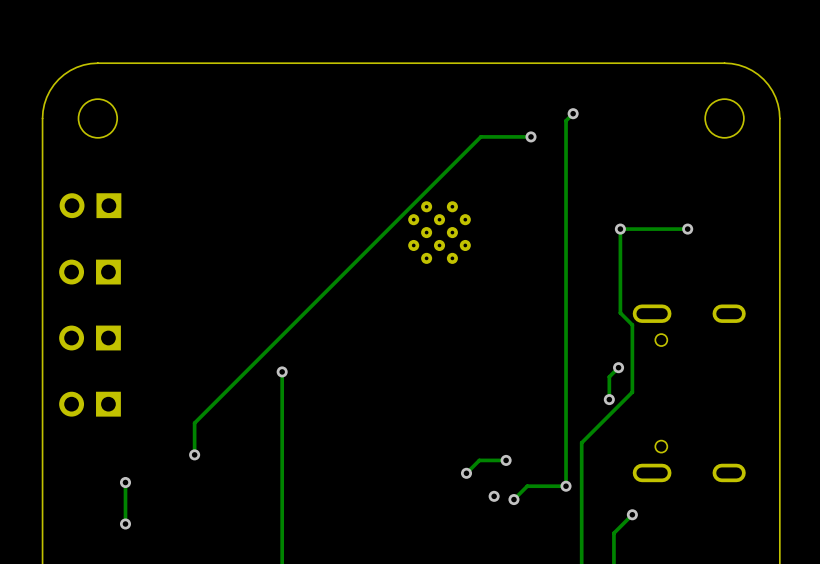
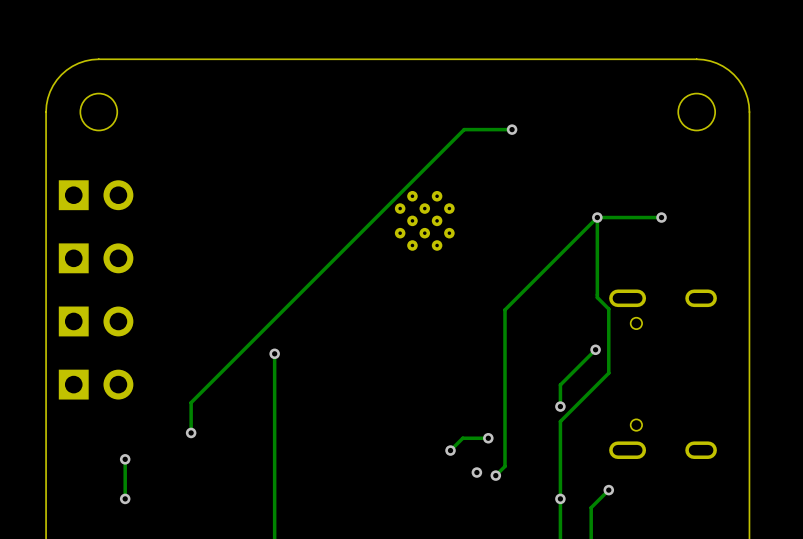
track: (573, 113) (566, 120) (566, 486) (527, 486) (523, 489) -> (597, 217) (505, 309) (505, 466)
via: (573, 113) -> none
part footprint: [59, 193, 122, 219] -> [58, 180, 134, 211]
part footprint: [59, 259, 121, 285] -> [58, 243, 134, 274]
part footprint: [59, 325, 121, 351] -> [58, 306, 134, 337]
track: (609, 376) (609, 399) -> (586, 358) (560, 384) (560, 406)
part footprint: [59, 391, 121, 417] -> [58, 369, 134, 400]
via: (609, 399) -> none
via: none -> (560, 406)
via: (566, 486) -> none
via: none -> (560, 498)

